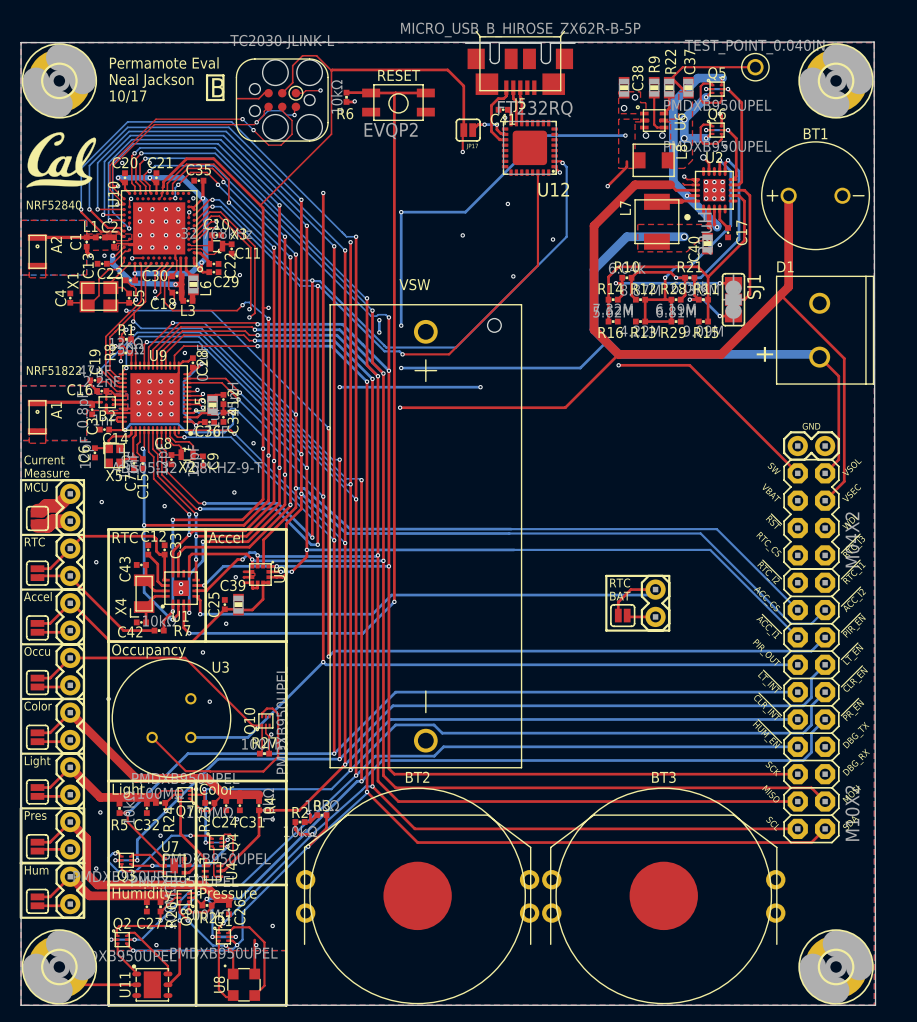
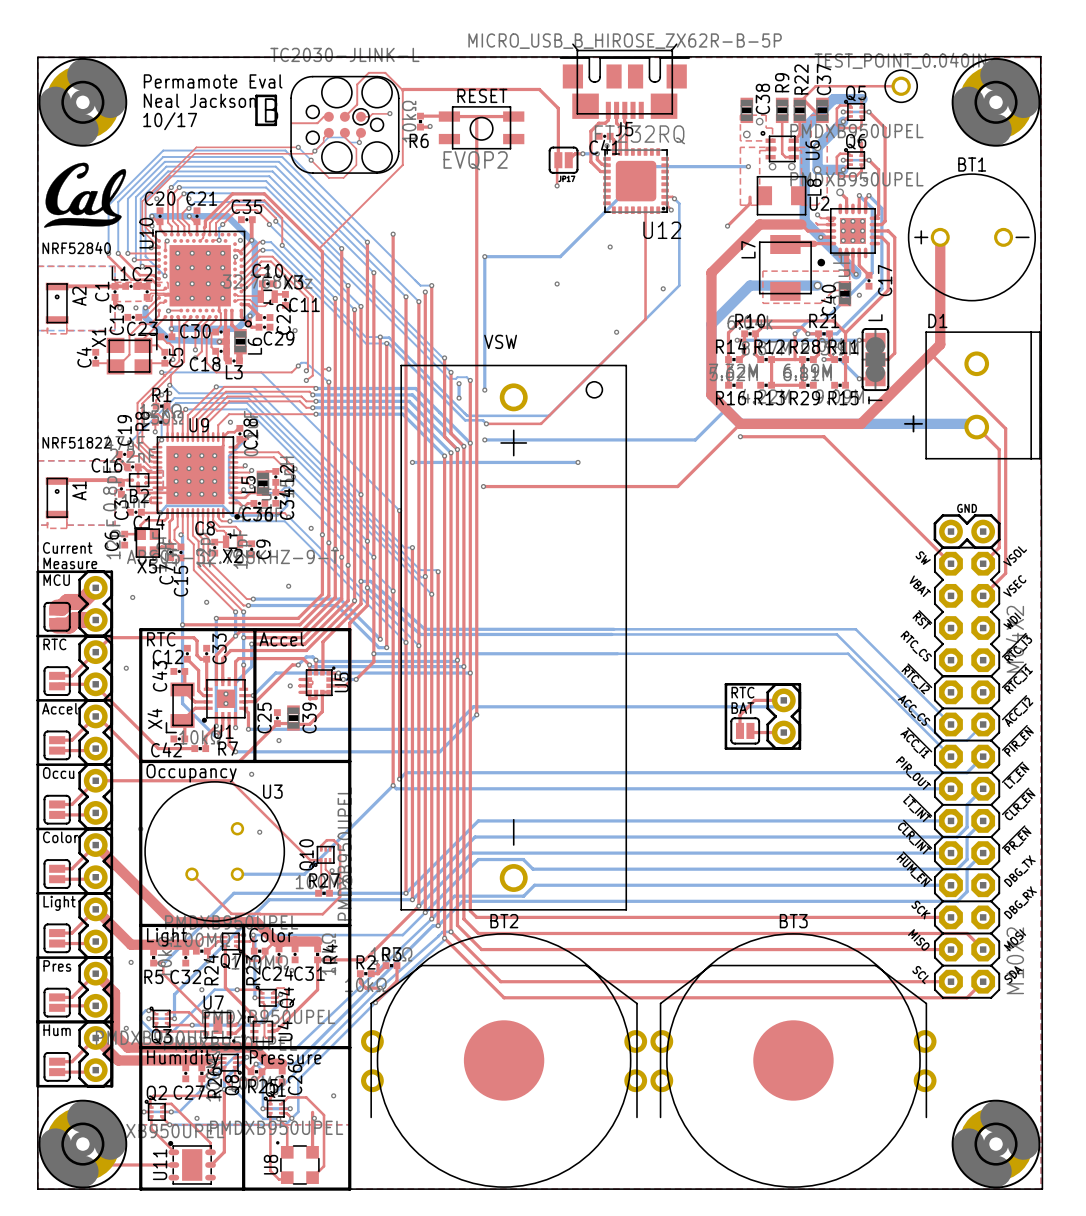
U2 name position: U2 (714, 157) -> U2 (819, 203)
text: none -> L (875, 317)
SJ1 name: SJ1 (755, 287) -> none
text: none -> T (875, 400)
C12 name position: C12 (153, 536) -> C12 (168, 656)
C39 name rotation: 0° (232, 585) -> 90° counterclockwise (309, 718)

